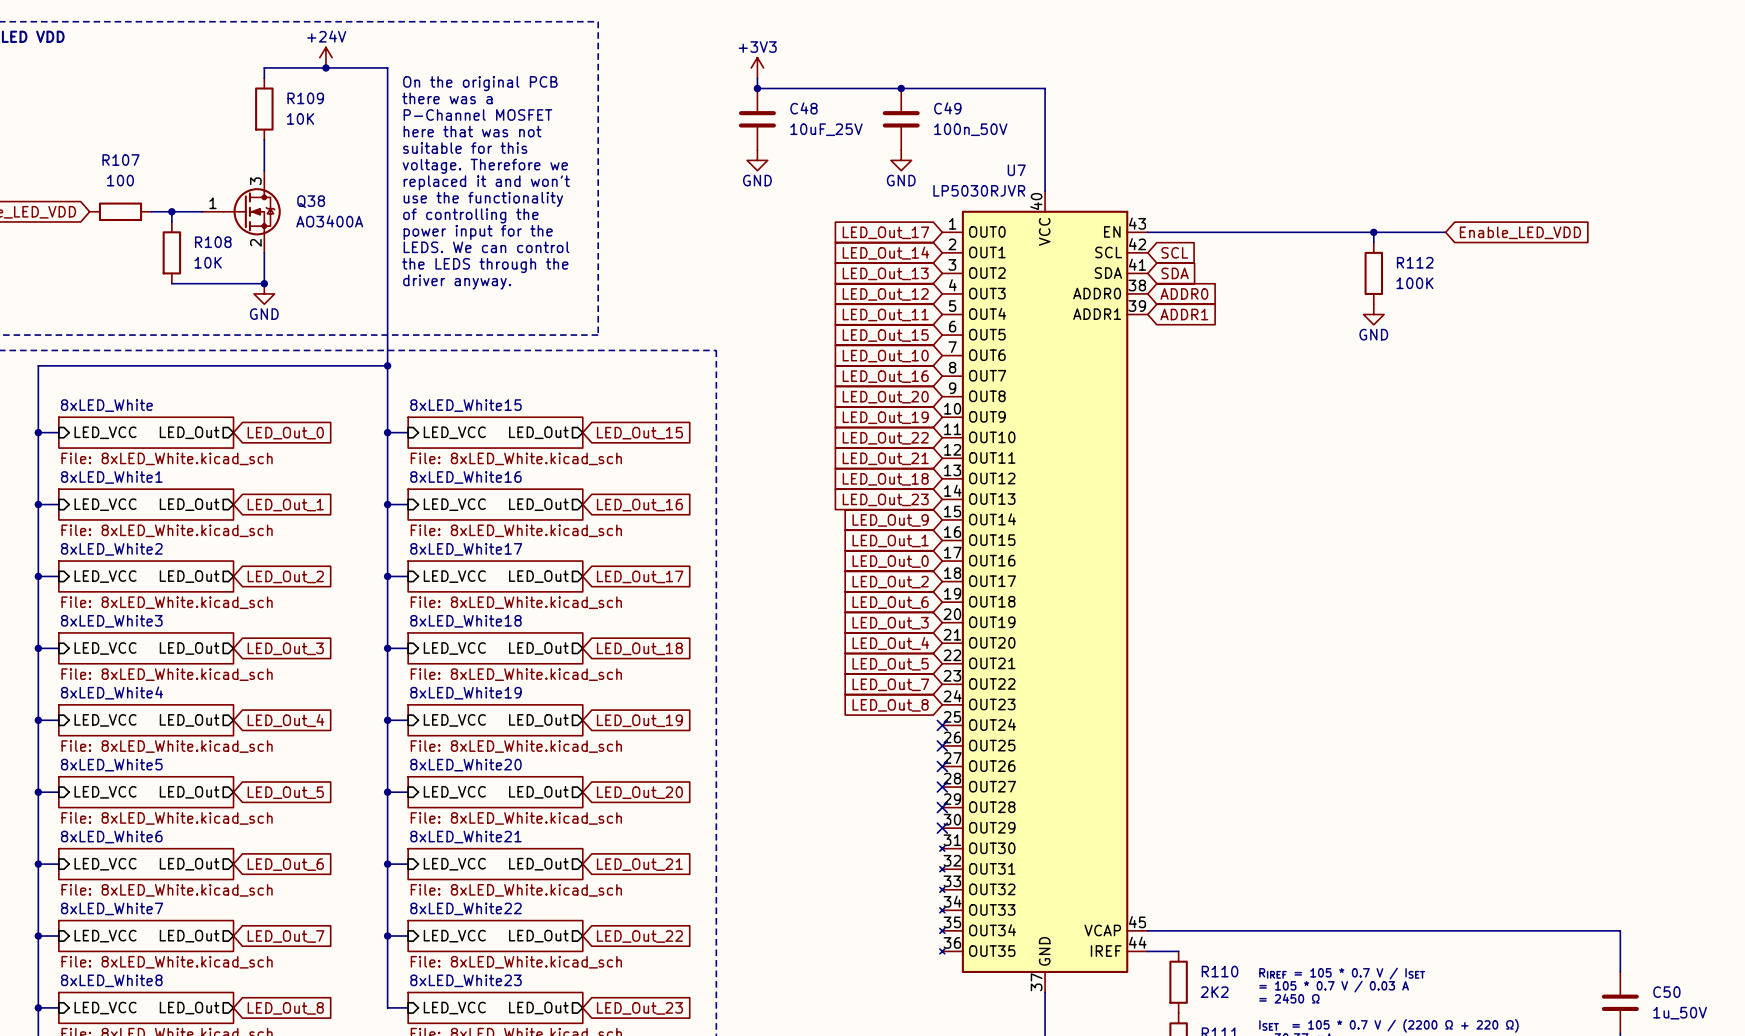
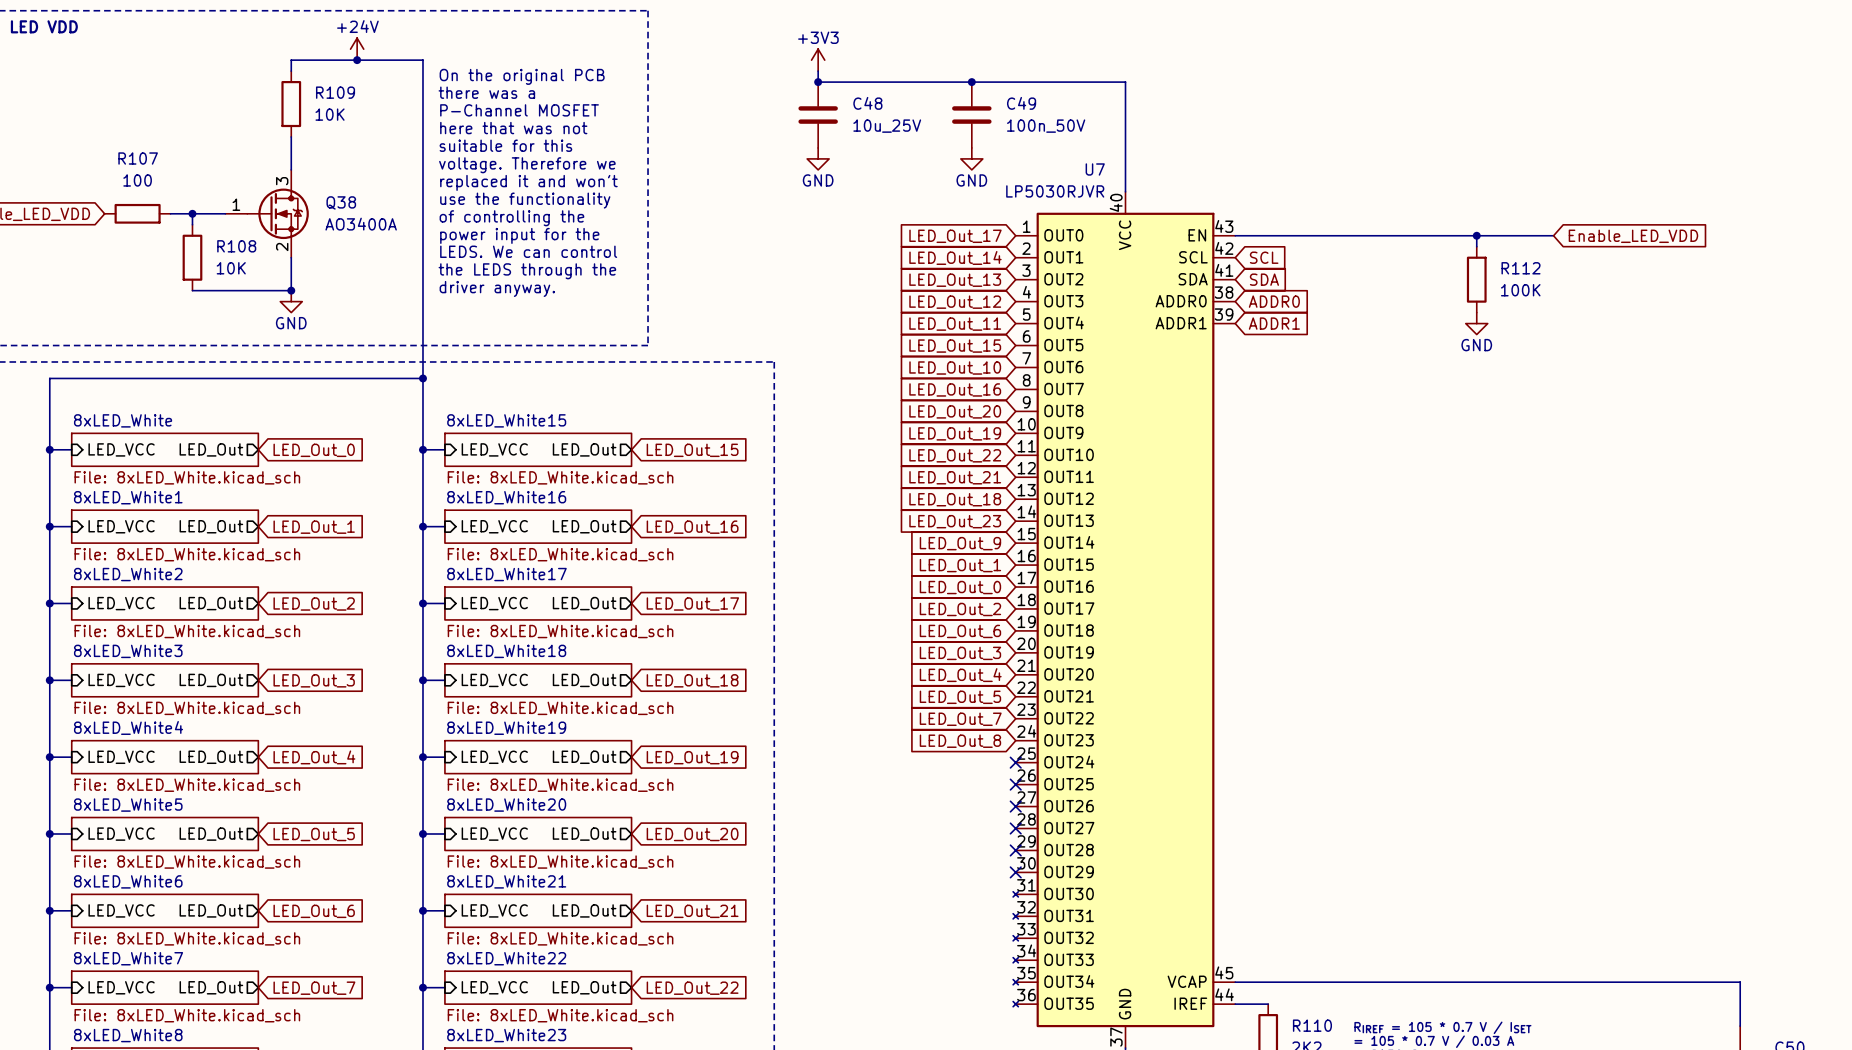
C48 value: 10uF_25V (826, 129) -> 10u_25V (887, 126)

